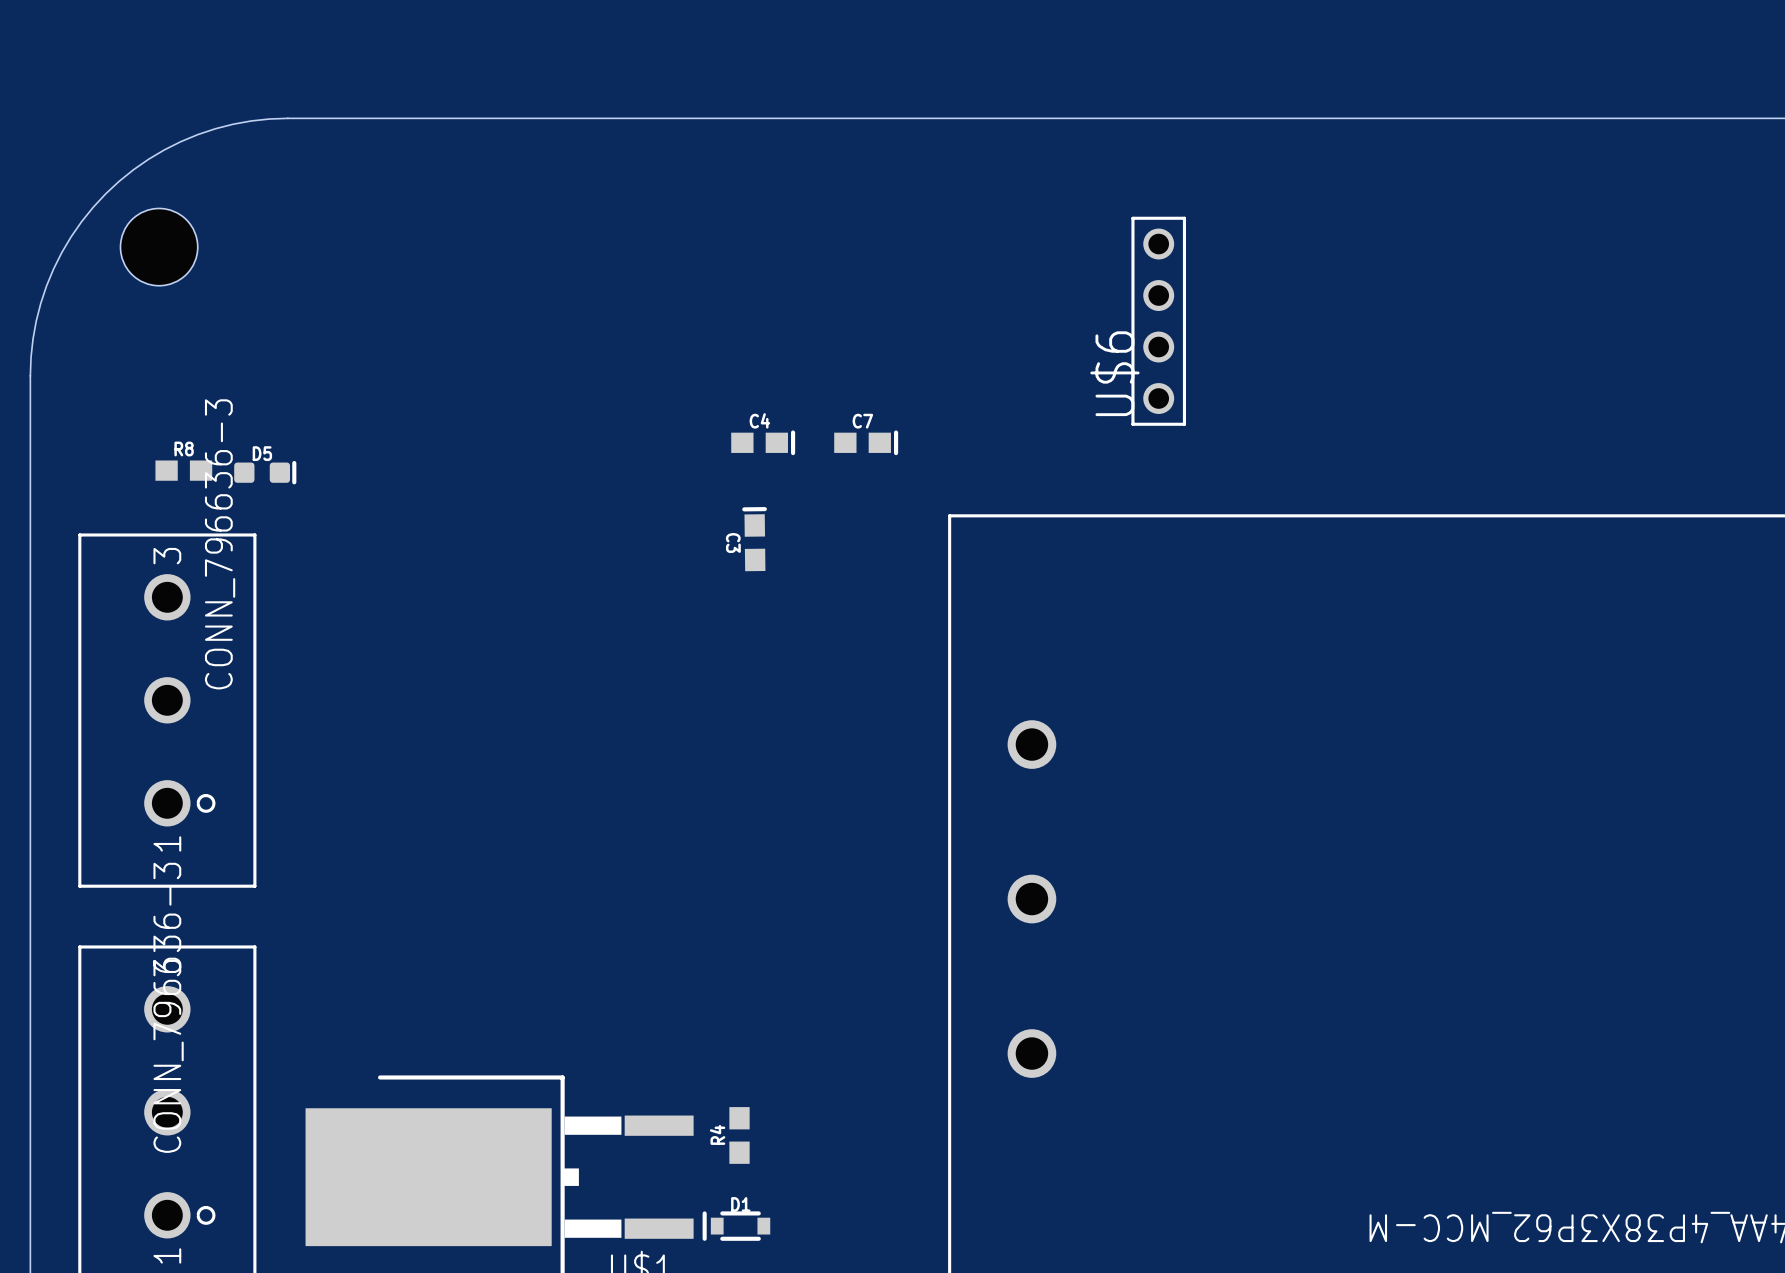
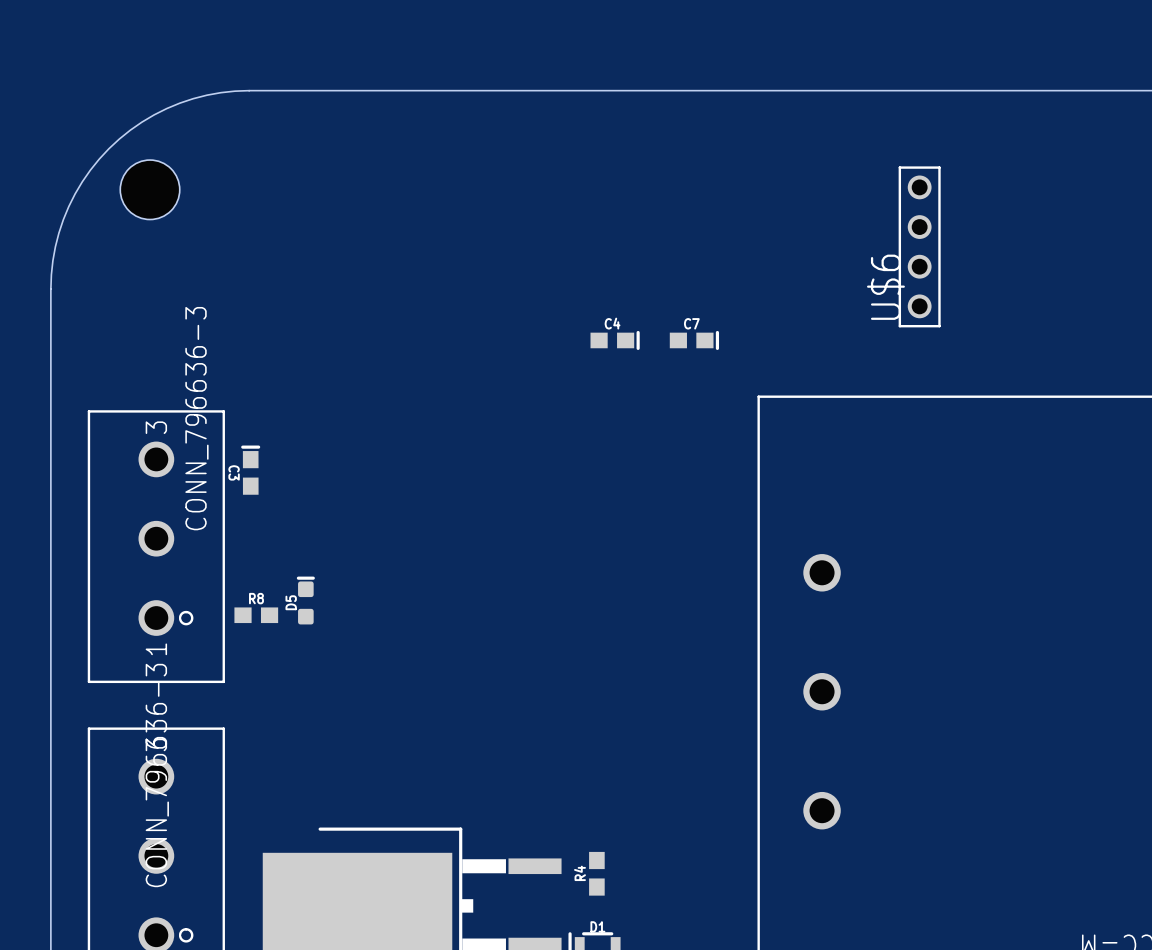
R8 position: (183, 470) -> (256, 615)
D5 rotation: 0° (265, 472) -> 90° counterclockwise (305, 600)
D5 position: (265, 472) -> (305, 600)
C3 position: (754, 539) -> (250, 470)
C3 name rotation: 0° (733, 543) -> 0.6° clockwise (234, 472)

